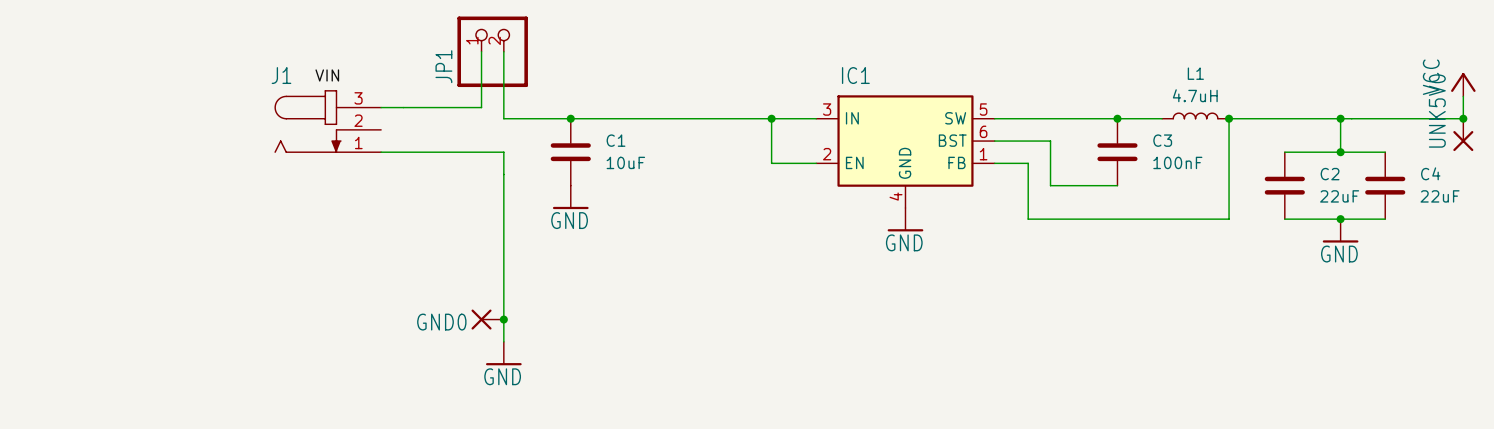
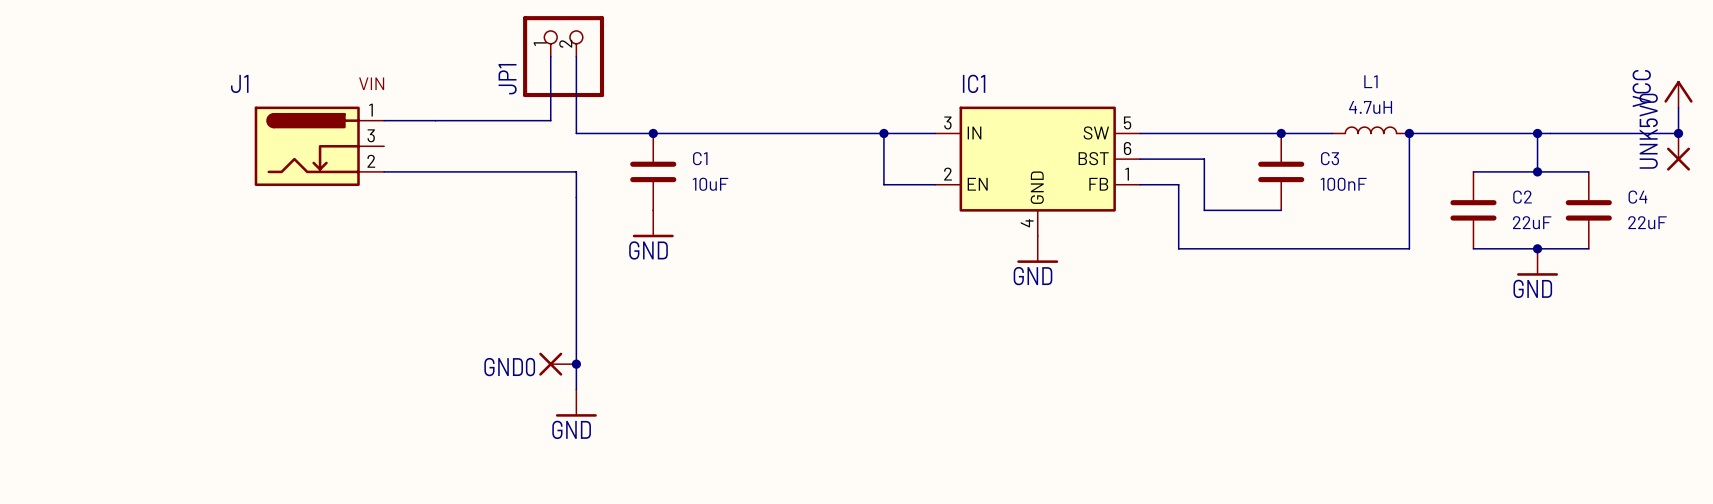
J1 name position: J1 (281, 75) -> J1 (239, 83)
J1 symbol: [274, 90, 382, 153] -> [254, 106, 385, 187]

